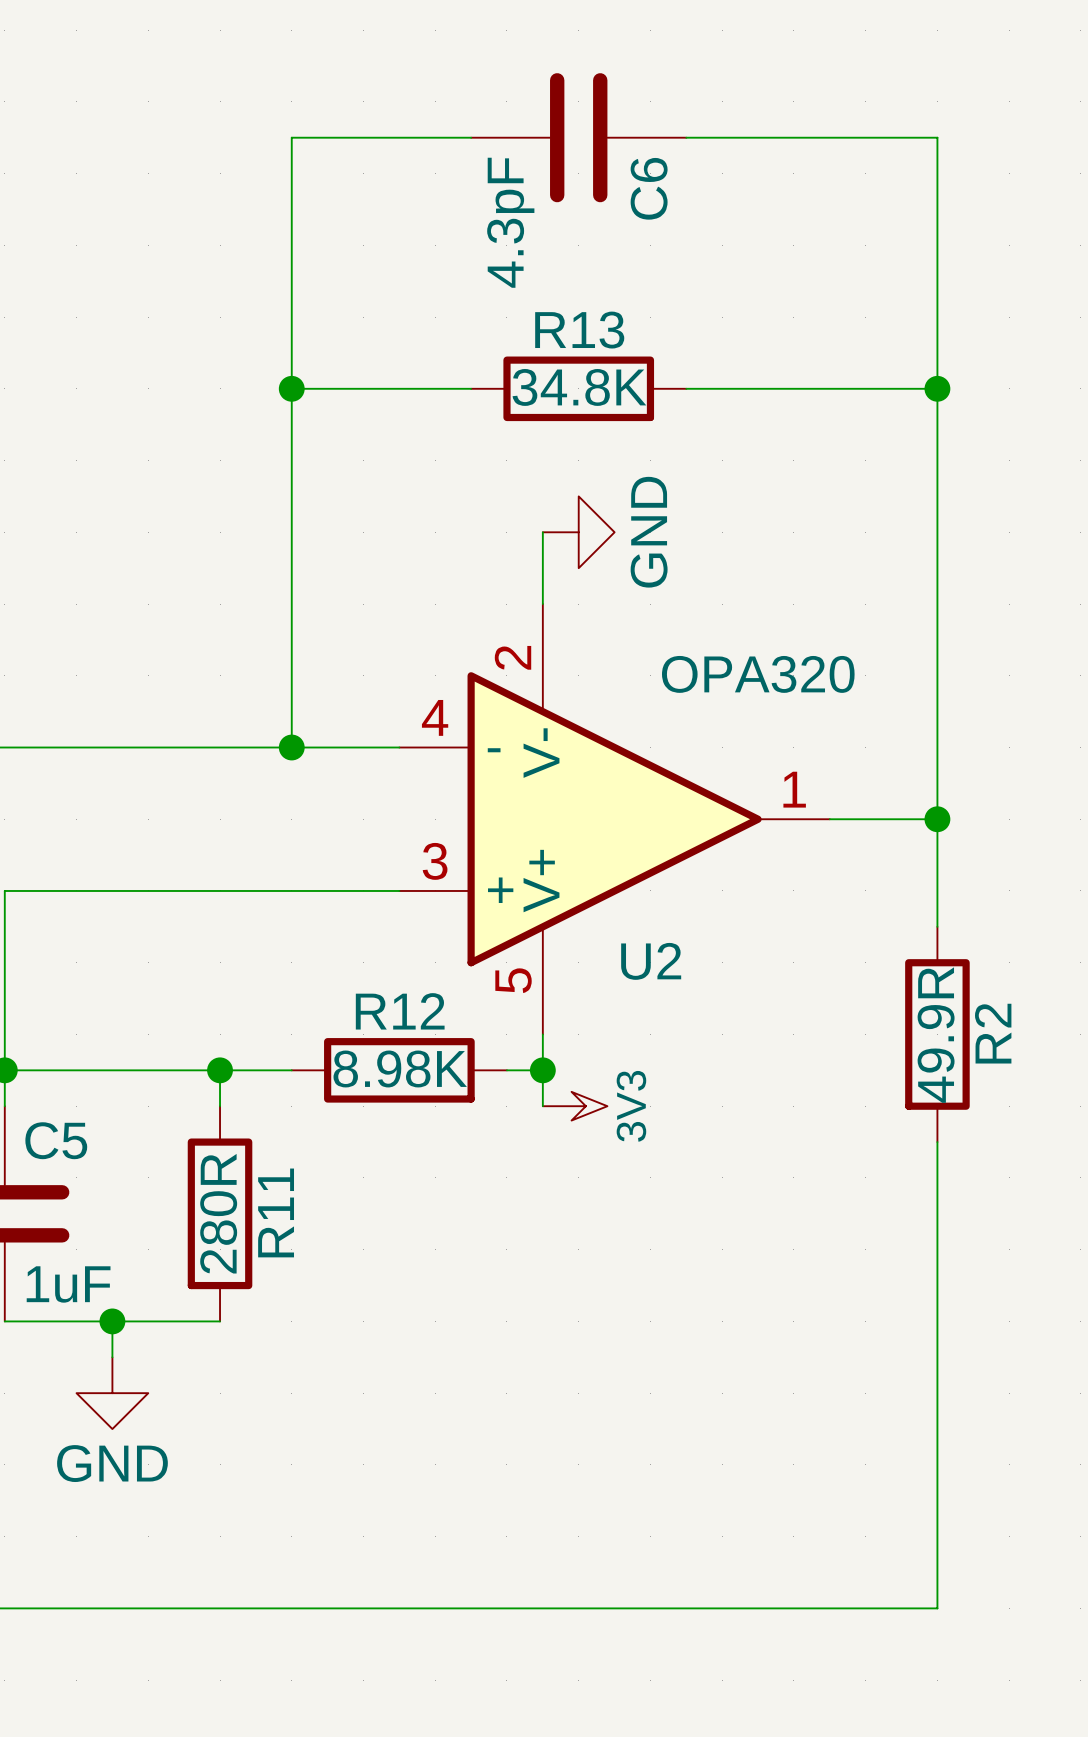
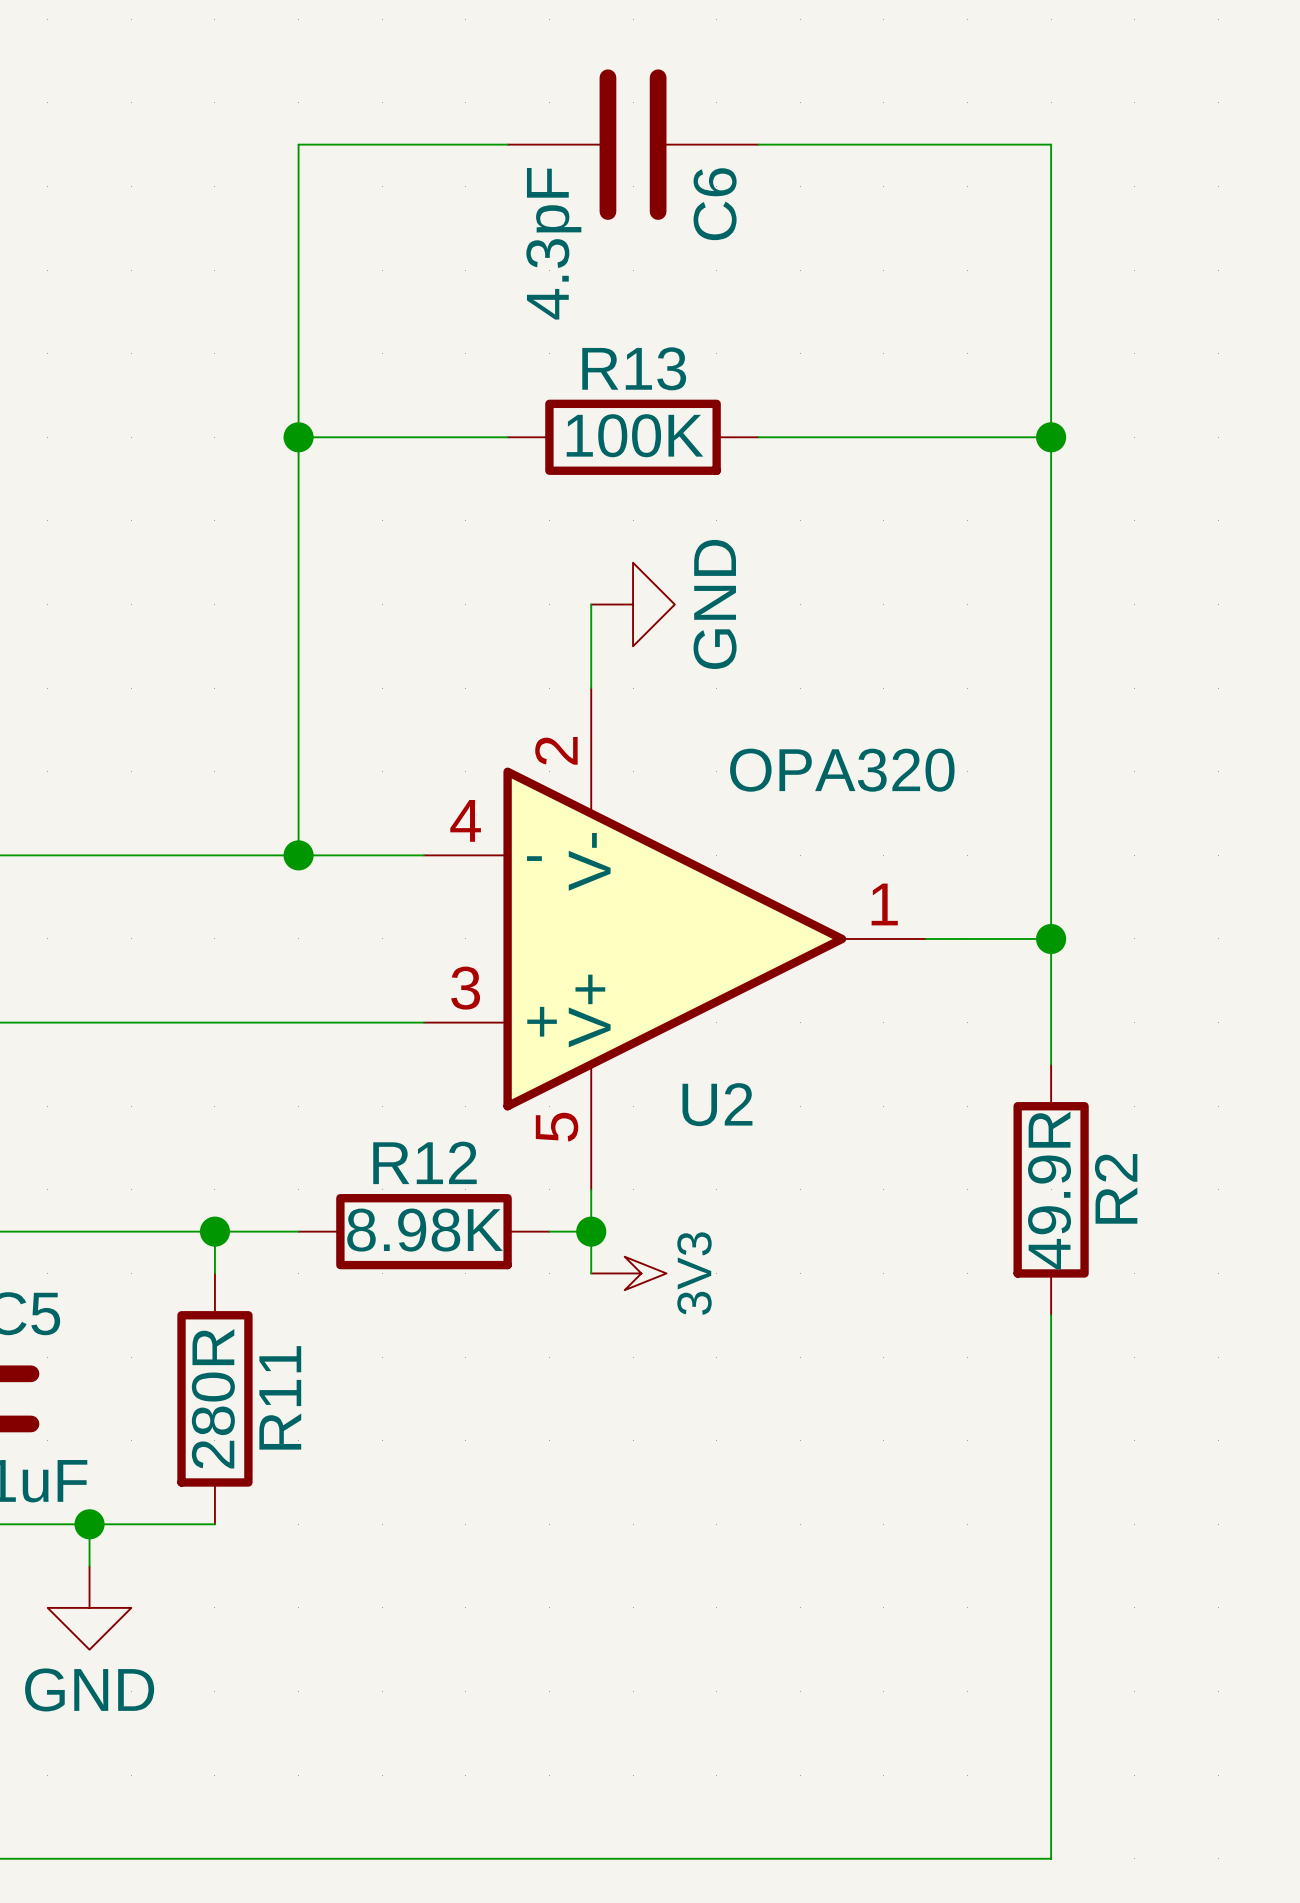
R13 value: 34.8K (579, 387) -> 100K (635, 435)

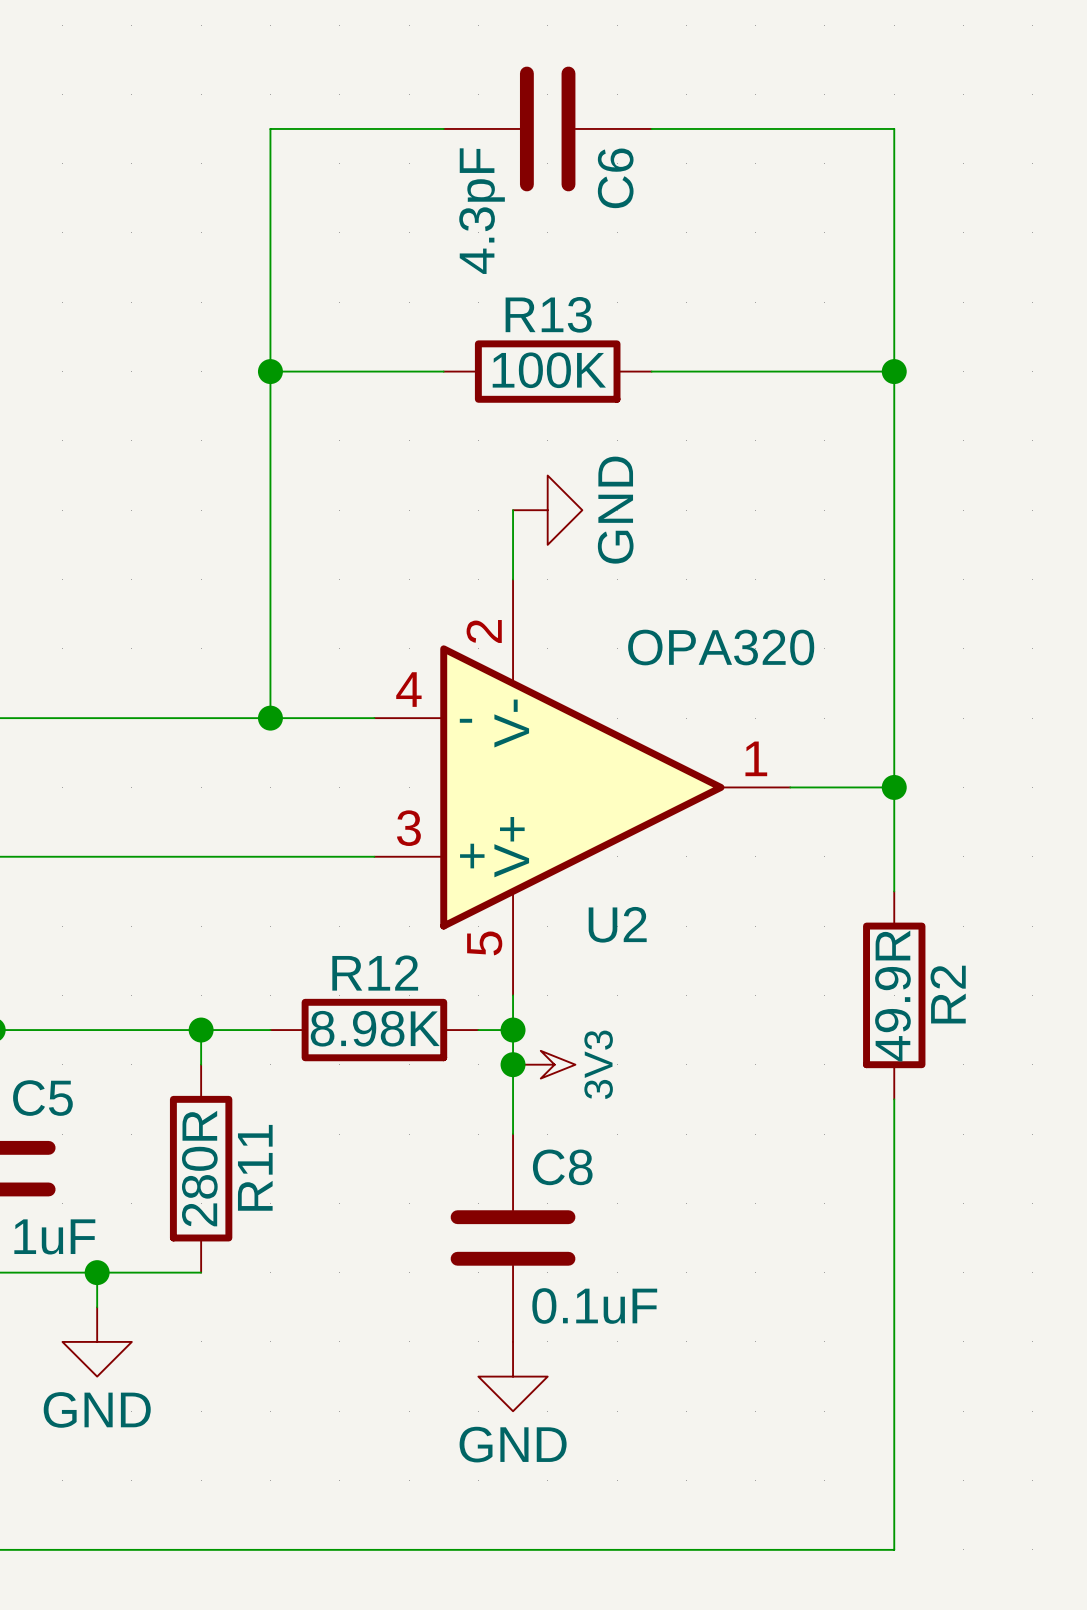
wire: none -> (513, 1064) (513, 1134)
junction: none -> (513, 1064)
C8: none -> 0.1uF (513, 1237)
power symbol: none -> GND (513, 1376)

